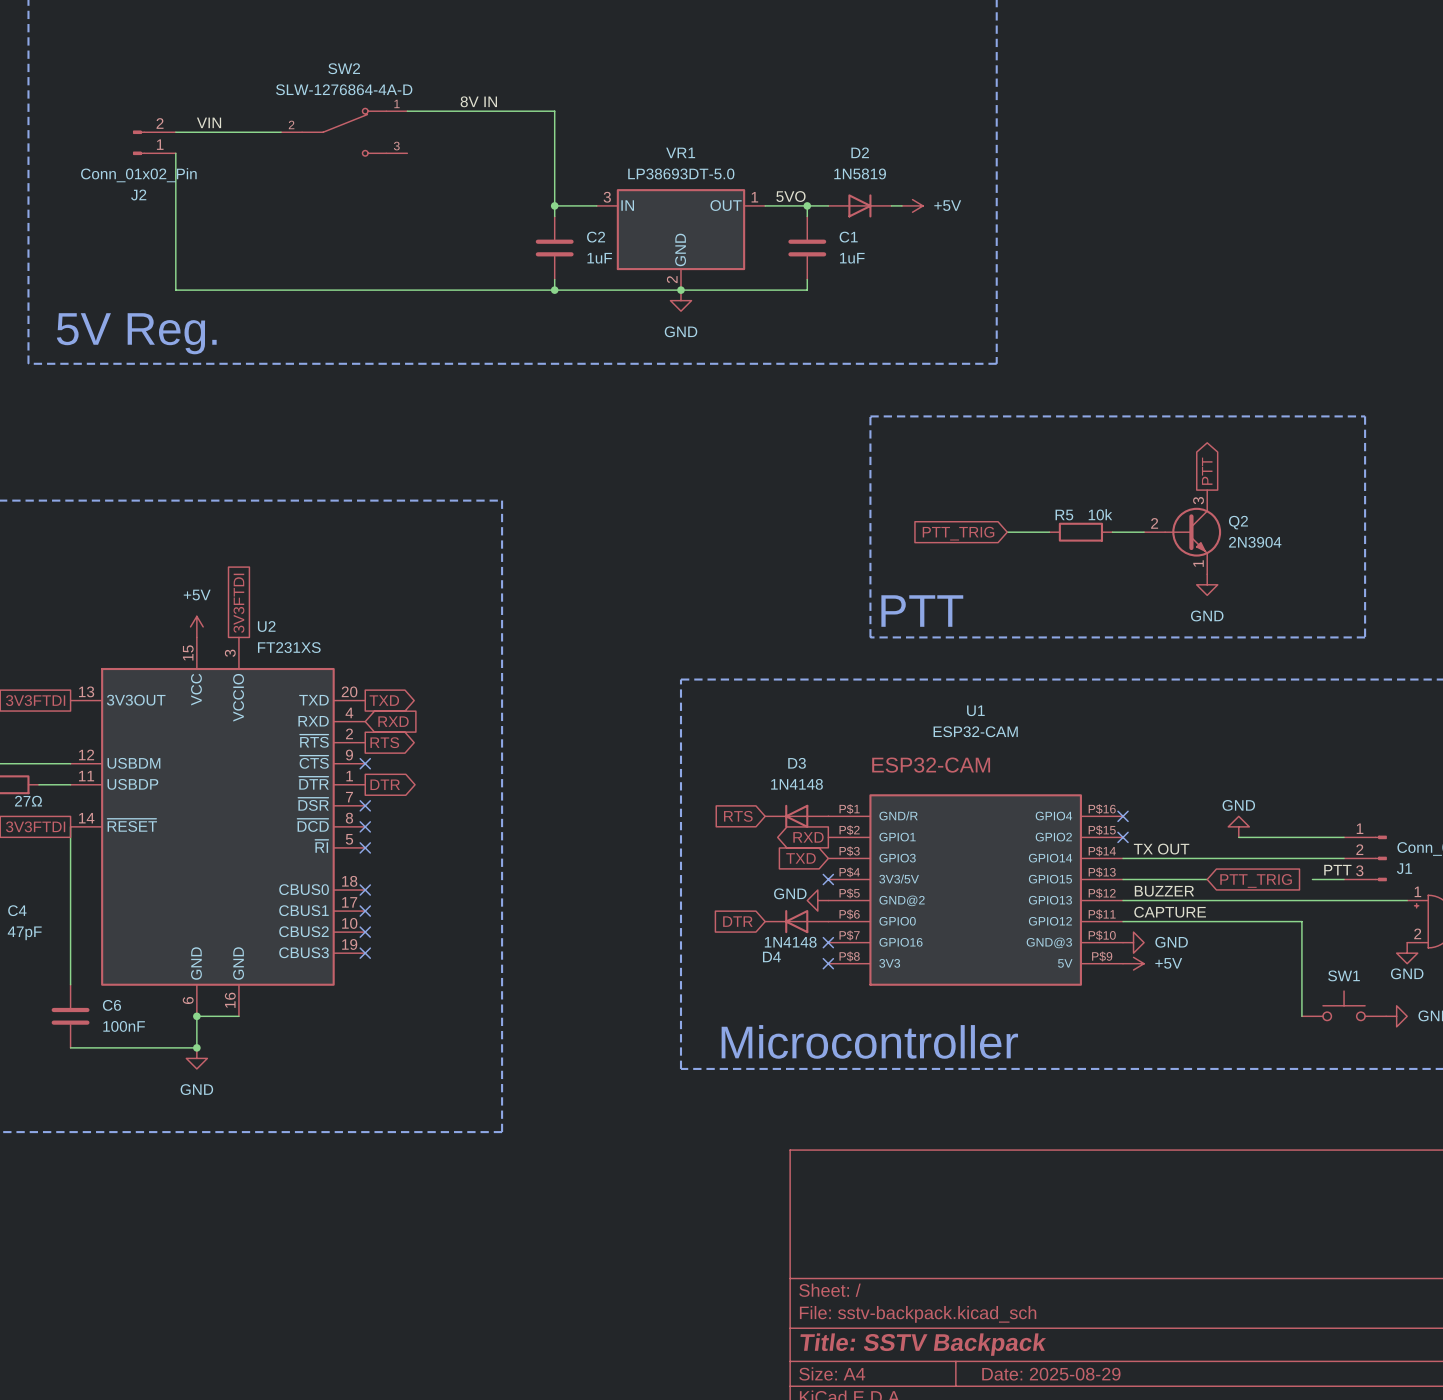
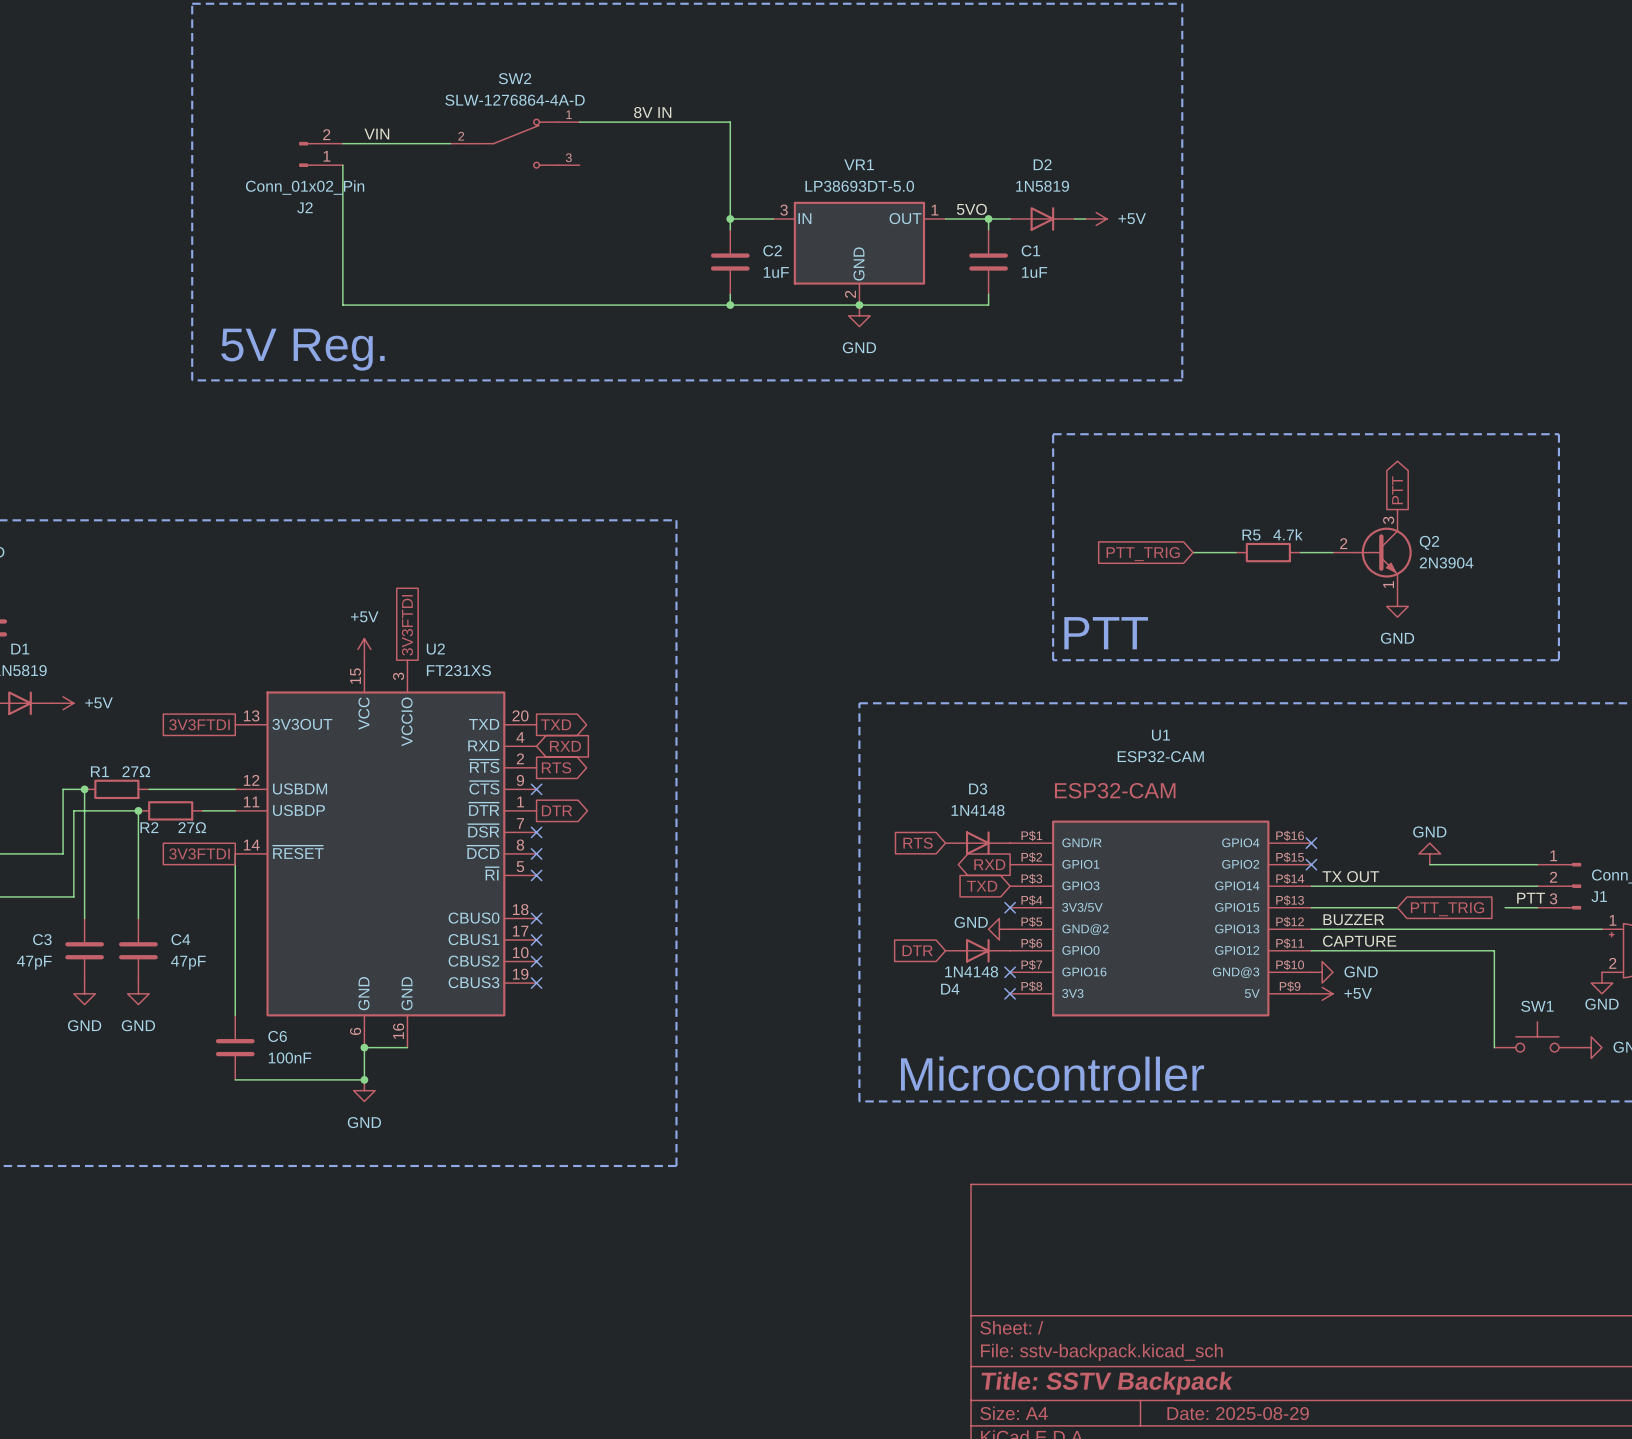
R5 value: 10k (1100, 514) -> 4.7k (1287, 534)
D3 rotation: 0° (796, 816) -> 180° (977, 843)
D4 rotation: 0° (796, 921) -> 180° (977, 950)

